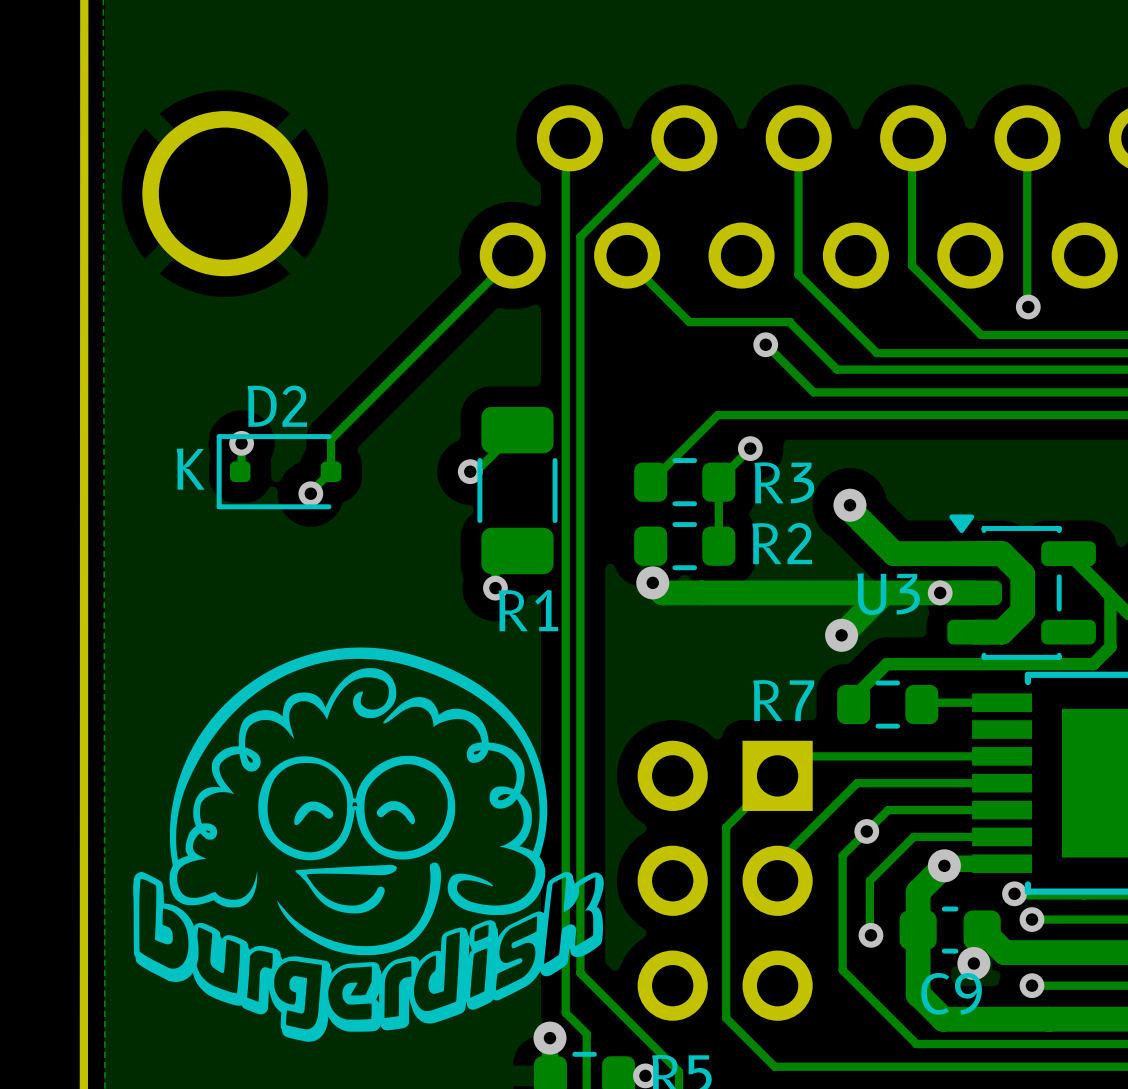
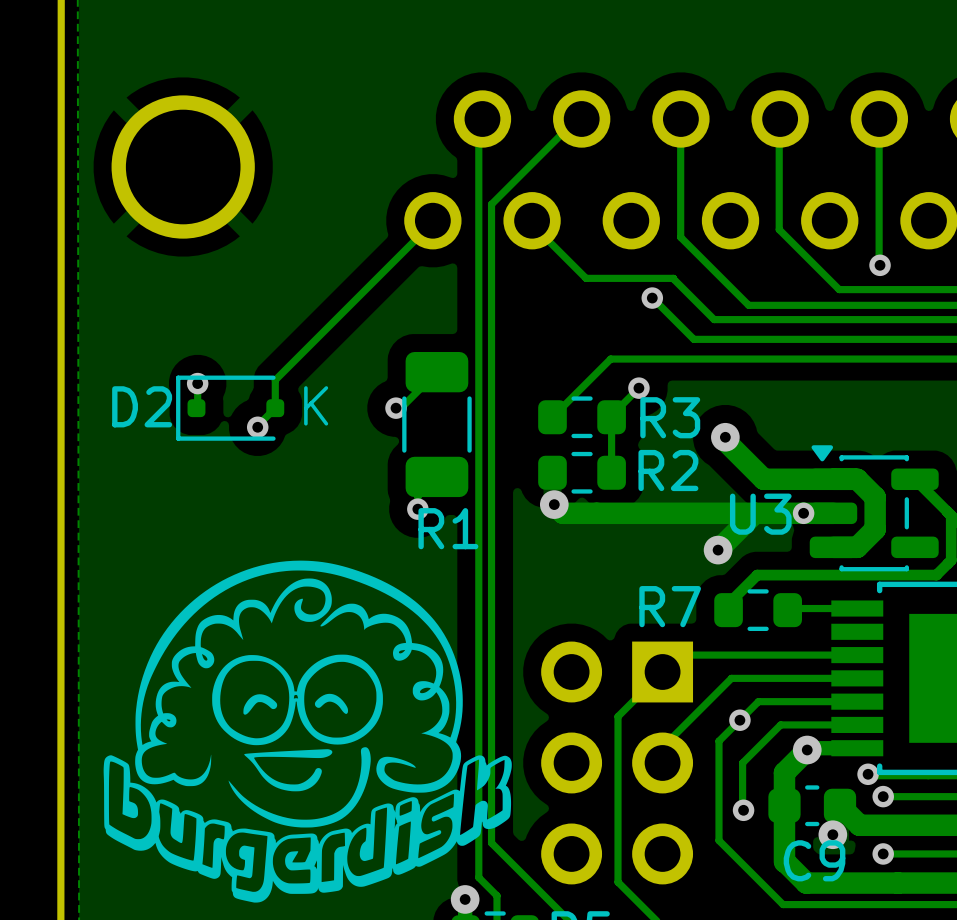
D2 name position: D2 (277, 406) -> D2 (142, 406)
D2 text position: K (190, 469) -> K (316, 405)

